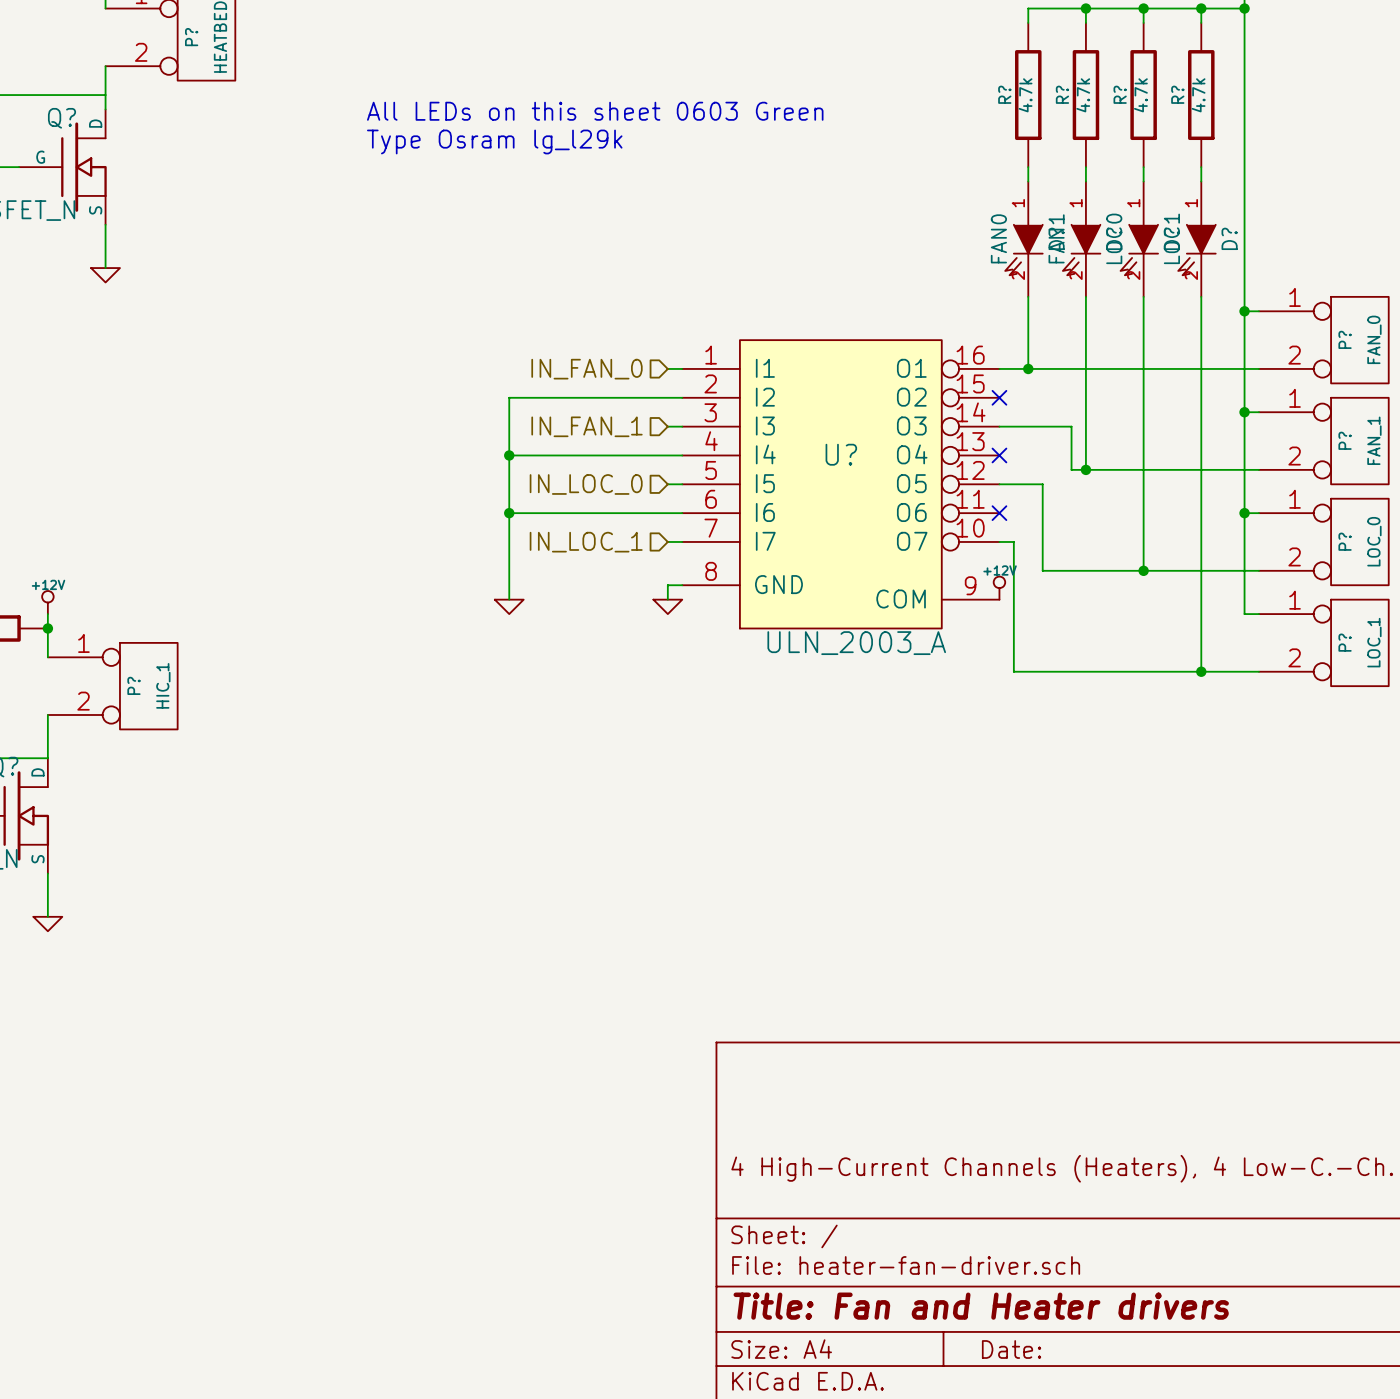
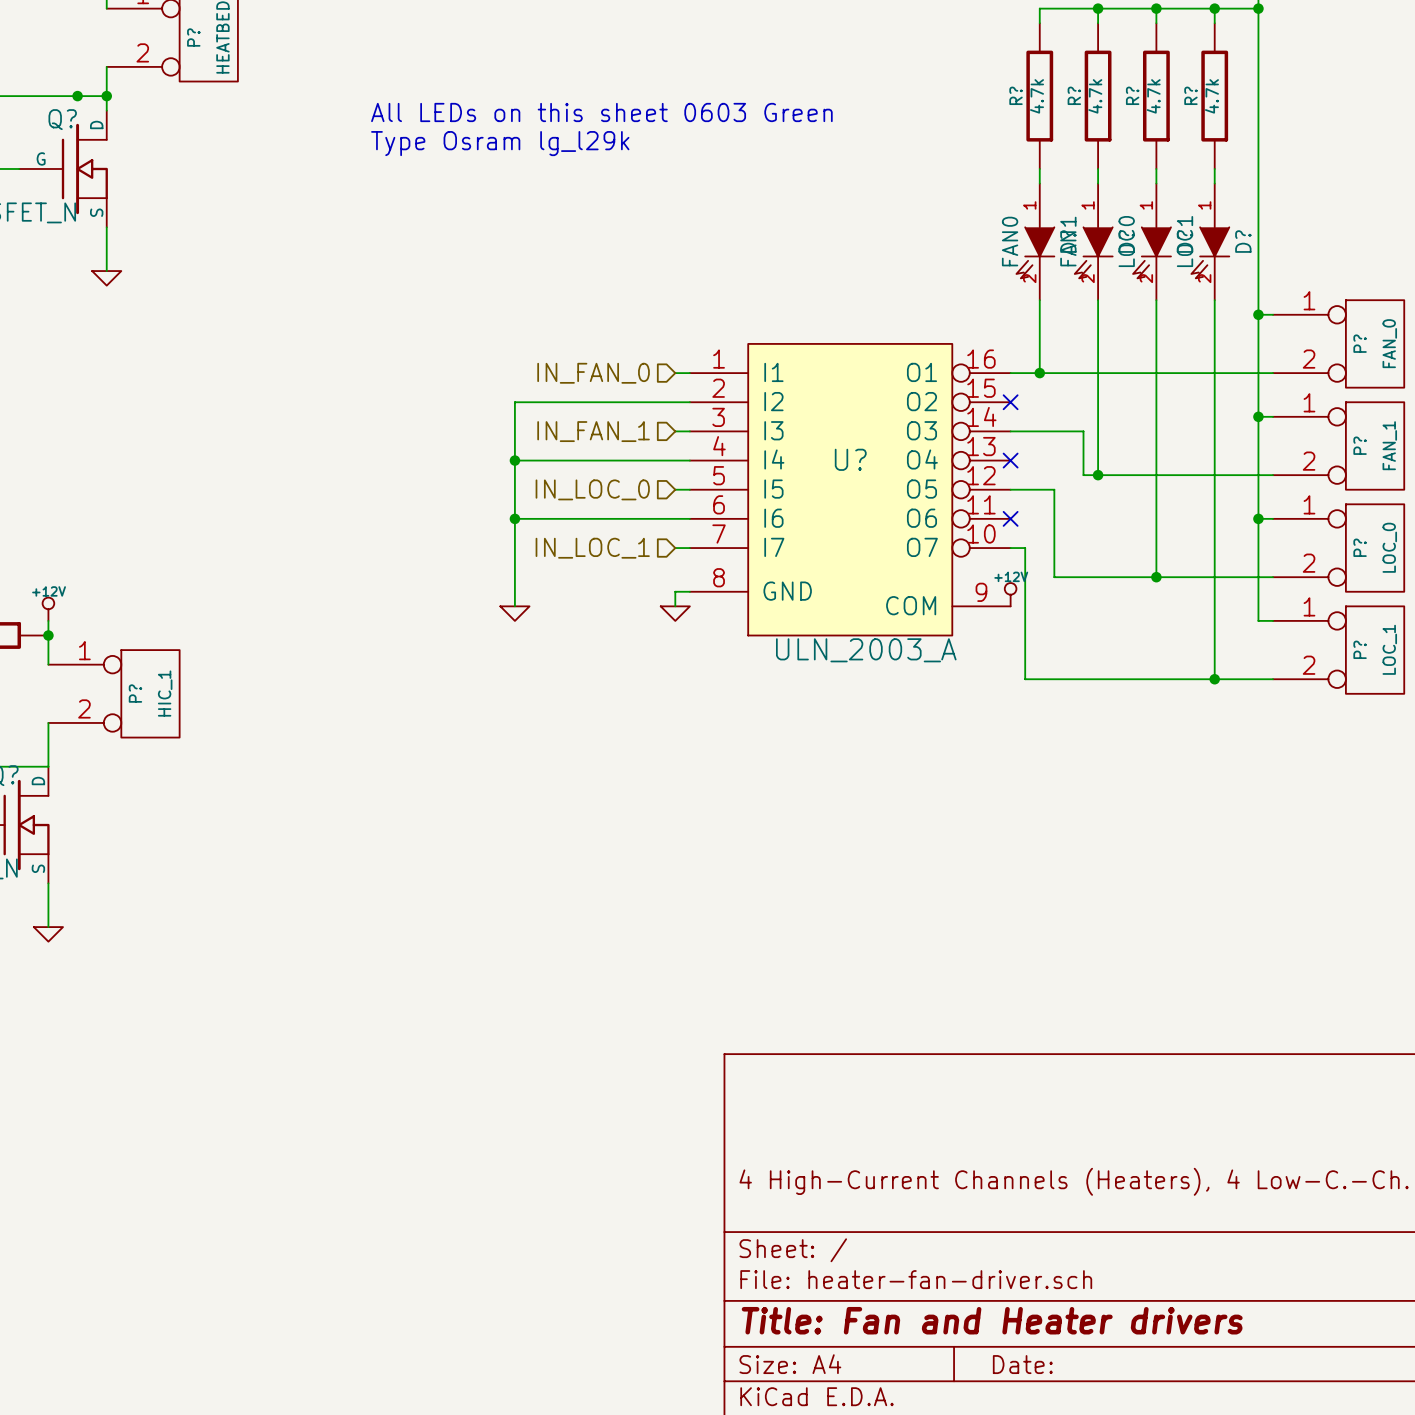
junction: none -> (77, 96)
junction: none -> (106, 96)

